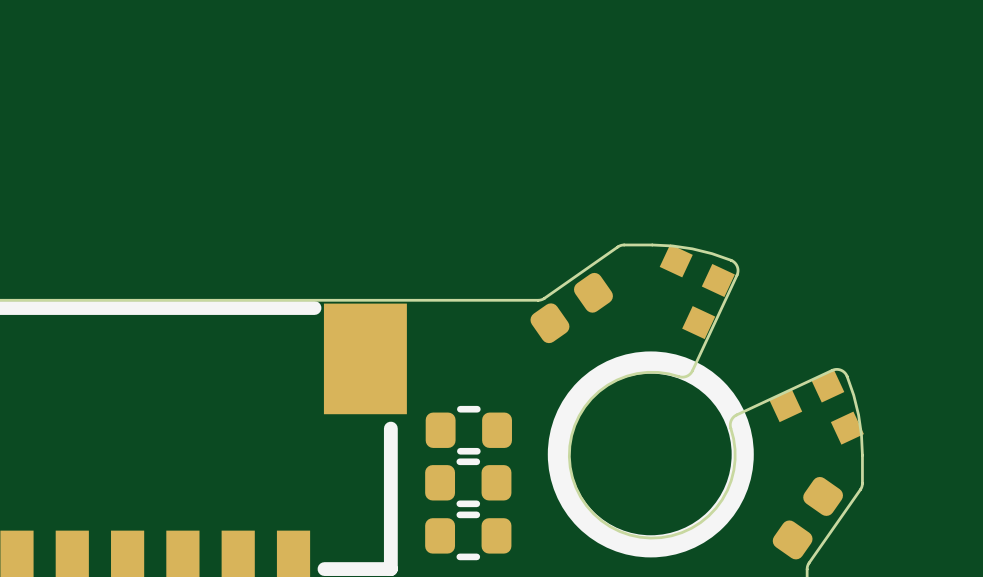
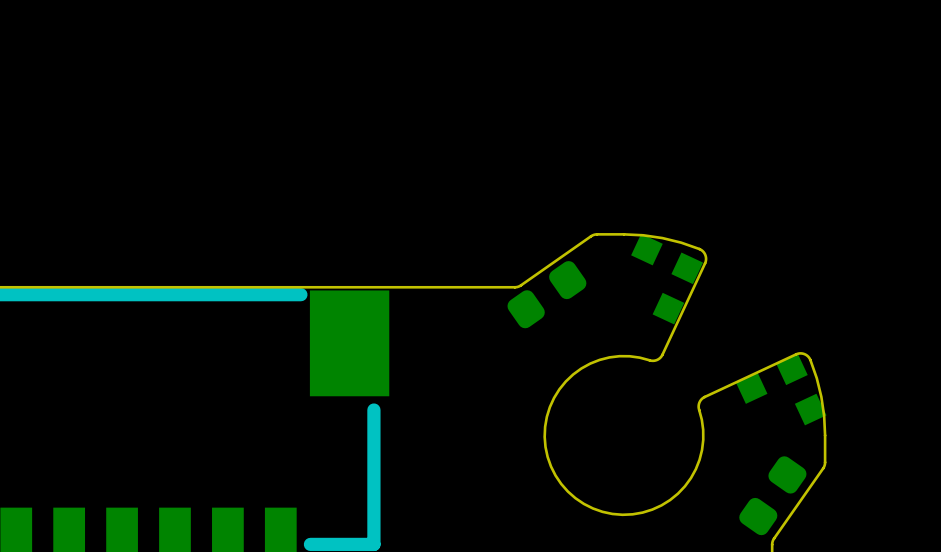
drawing: [547, 351, 754, 558] -> none
part: (468, 430) -> none
part: (468, 482) -> none
part: (468, 535) -> none

